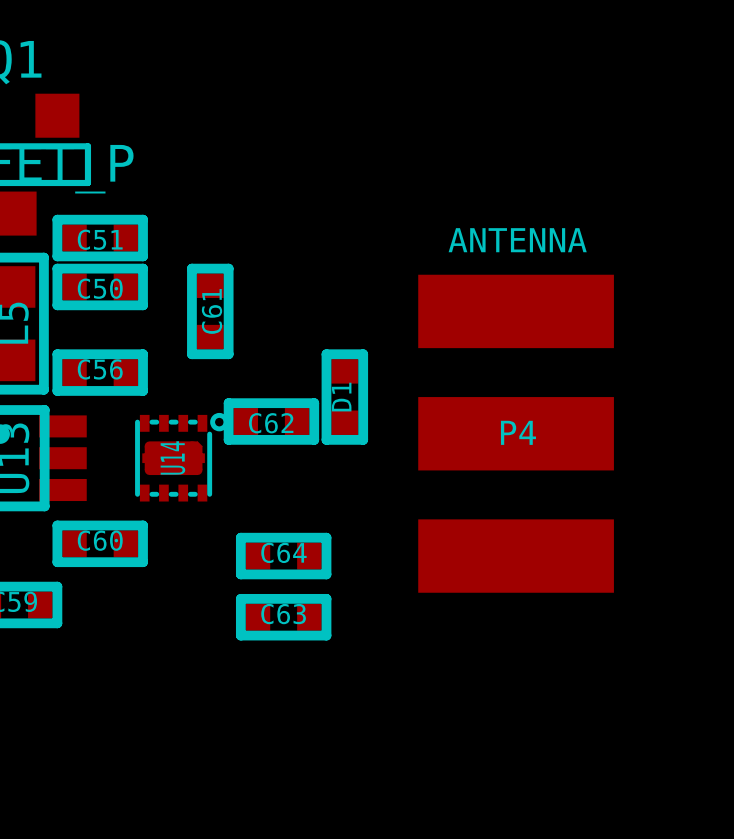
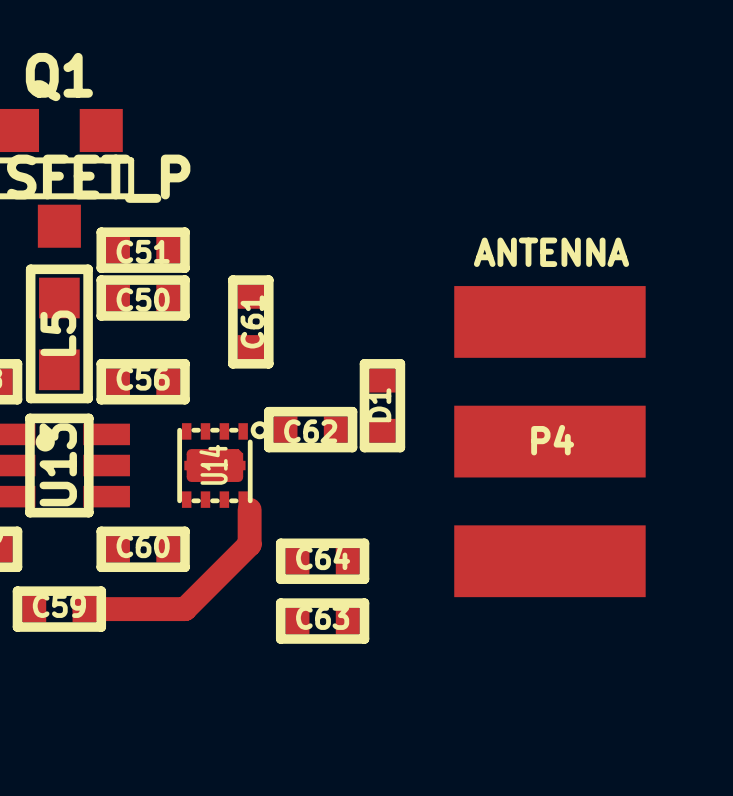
track: none -> (243, 499) (243, 503) (249, 509) (249, 544) (185, 609) (84, 609)

